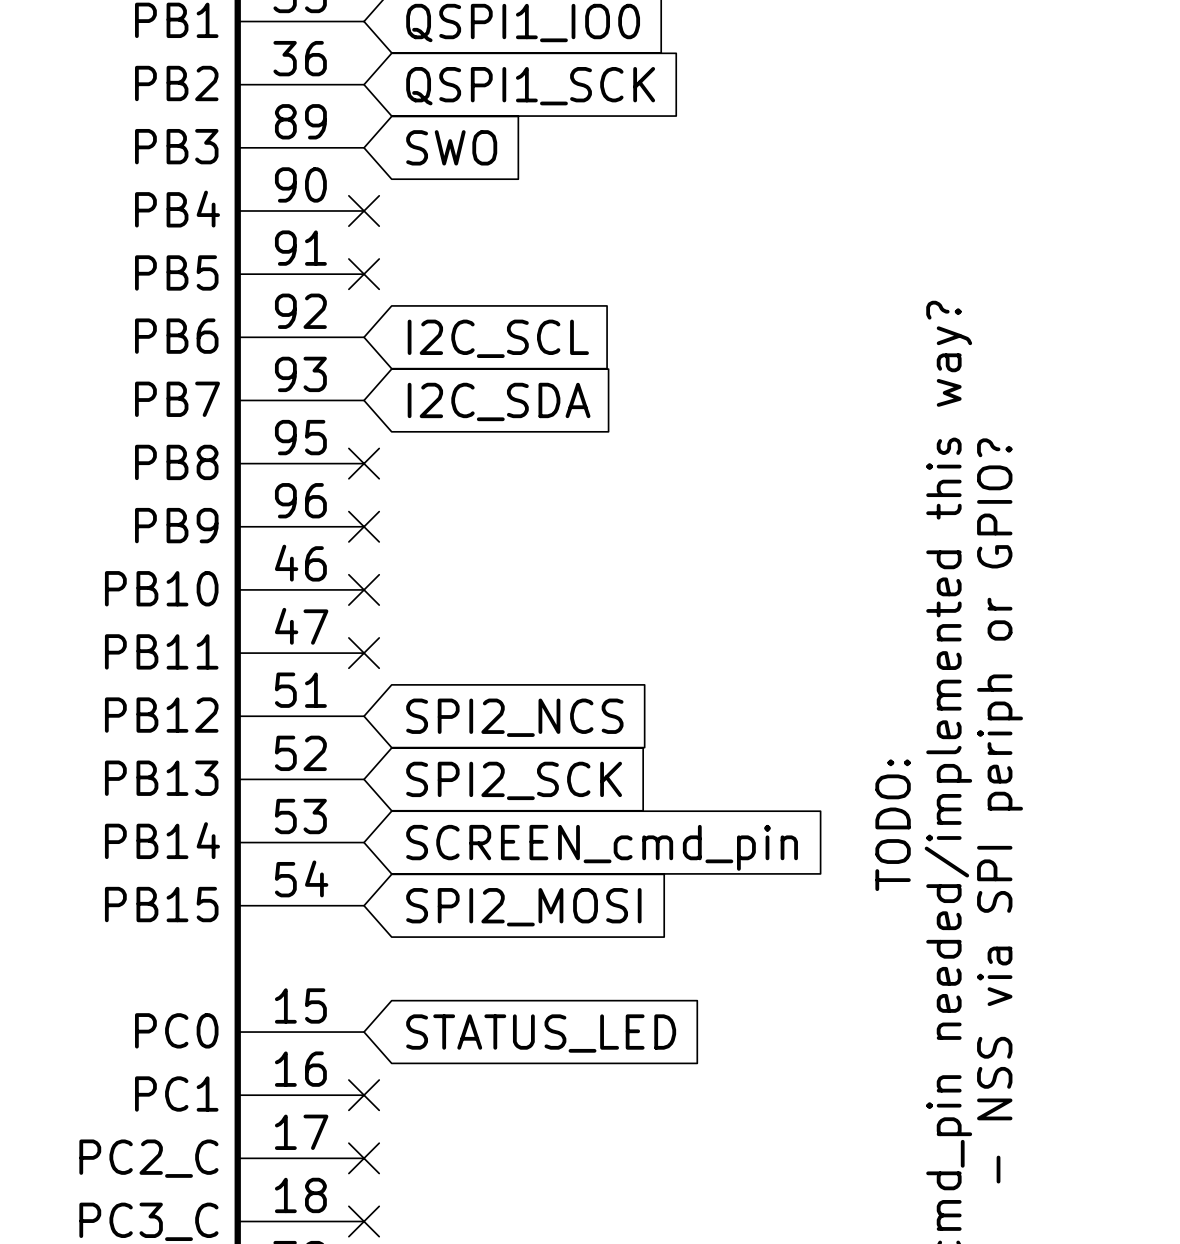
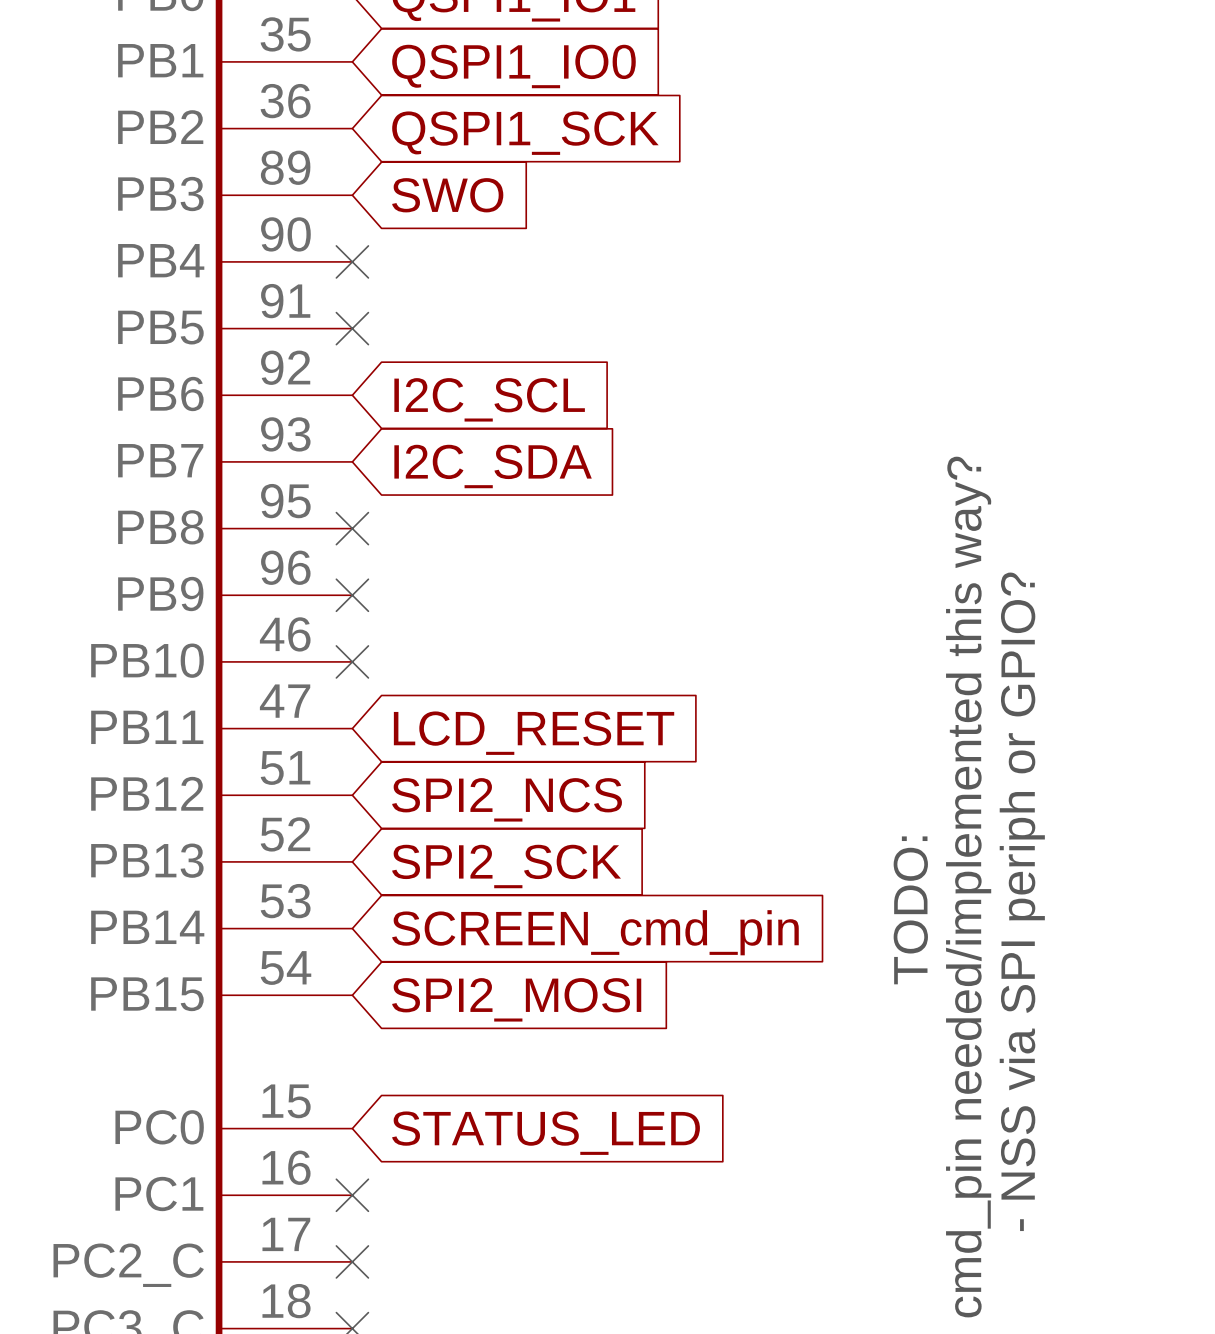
no-connect mark: (364, 653) -> none
global label: none -> LCD_RESET (534, 733)

